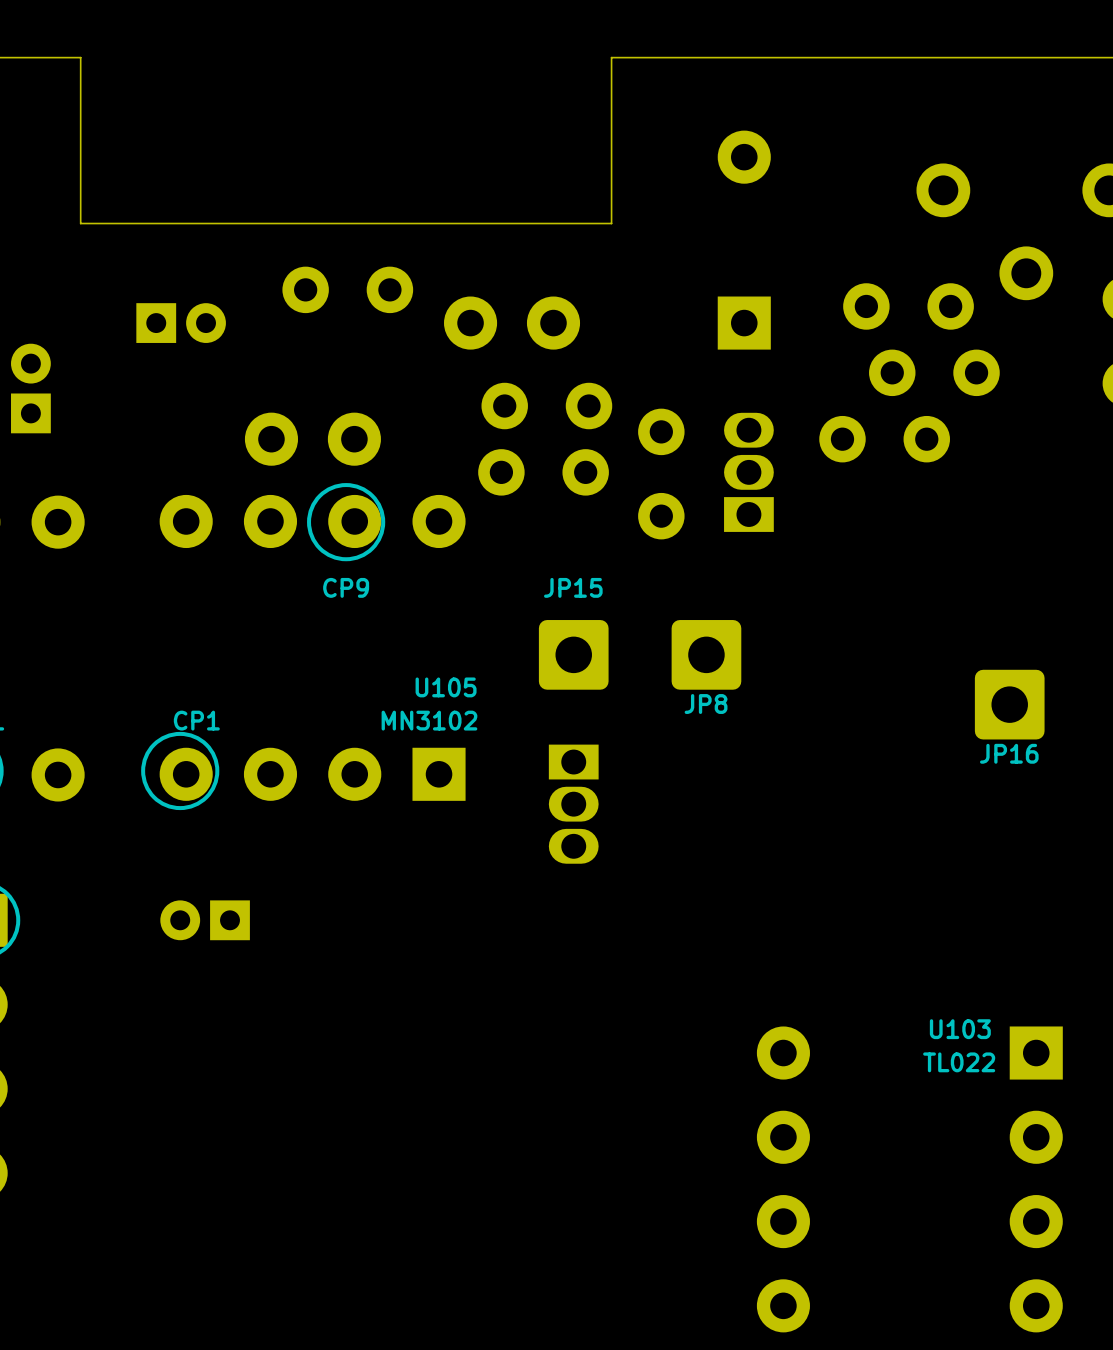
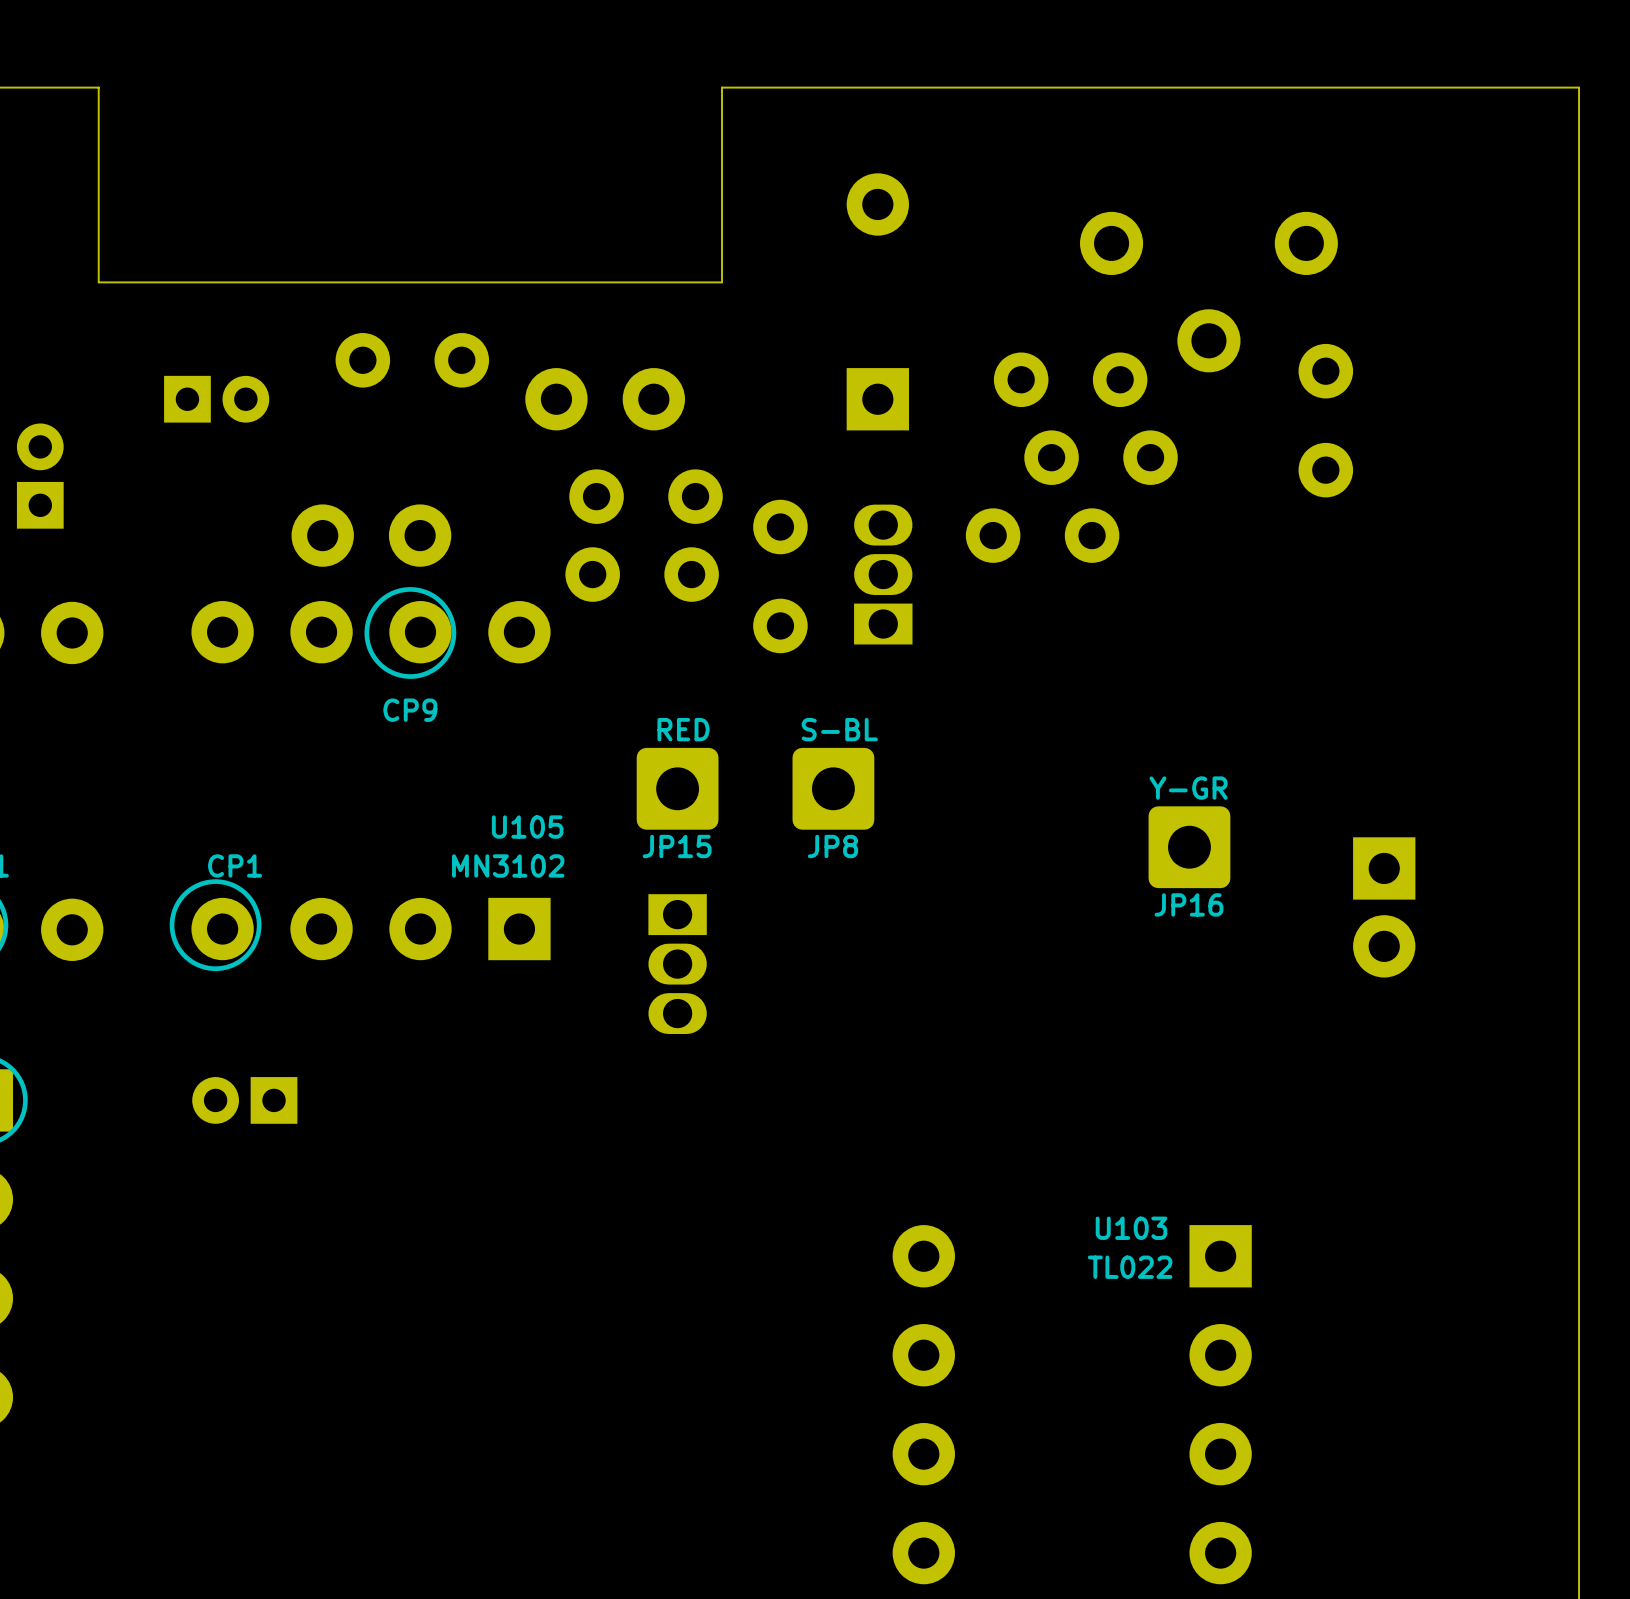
JP15 name position: JP15 (573, 587) -> JP15 (677, 846)
JP15 value: none -> RED (683, 729)
JP8 value: none -> S-BL (839, 729)
JP16 value: none -> Y-GR (1188, 788)

